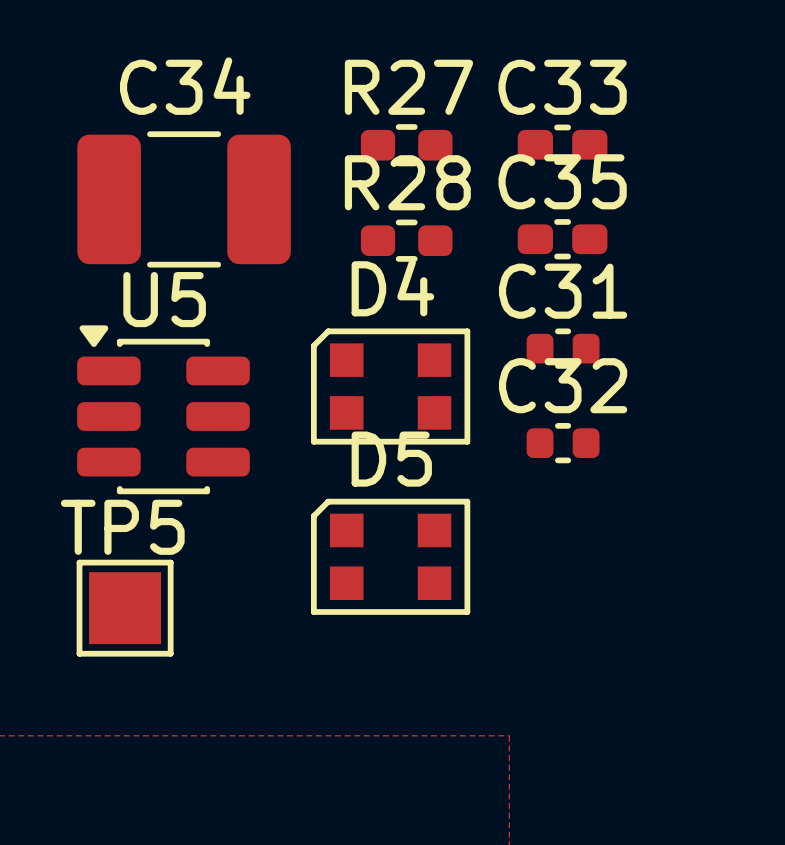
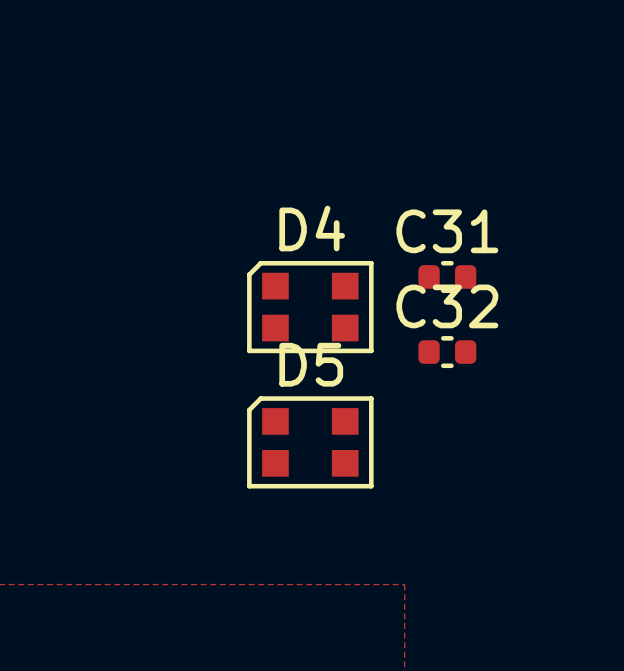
C33: (562, 144) -> none
R27: (406, 145) -> none
C34: (184, 199) -> none
C35: (562, 239) -> none
R28: (406, 240) -> none
U5: (163, 409) -> none
TP5: (125, 608) -> none

